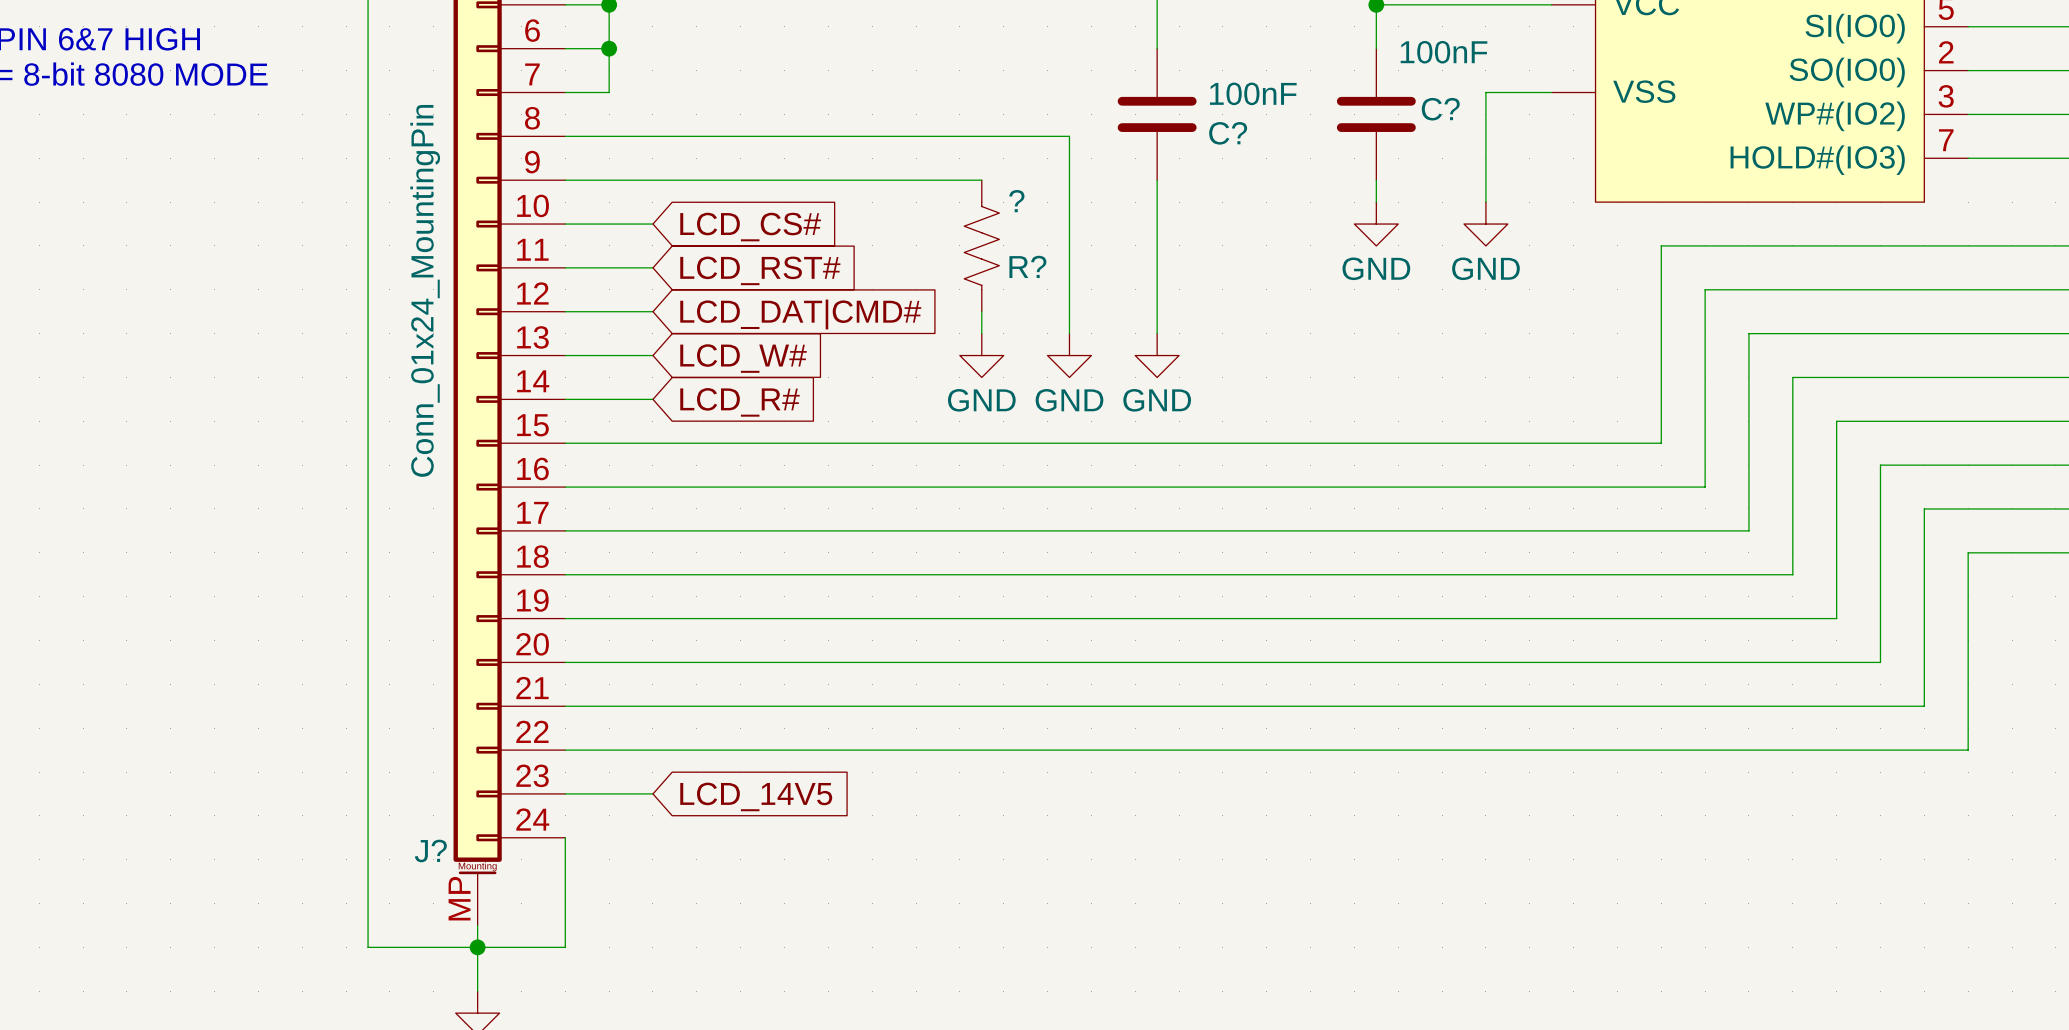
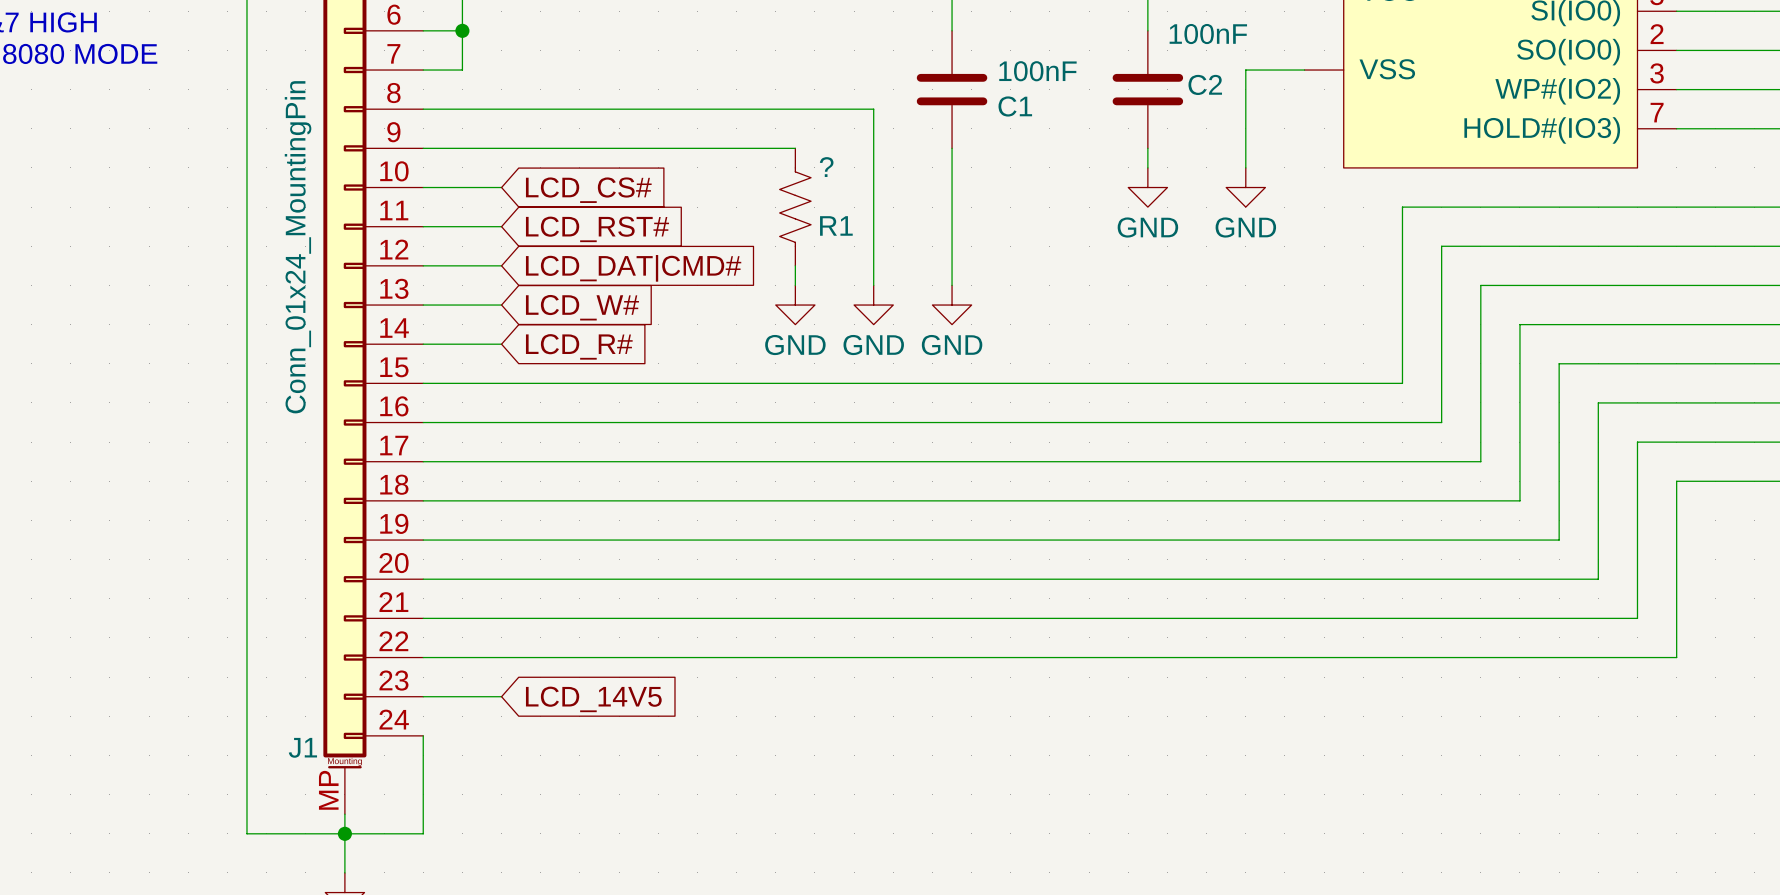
C? name: C? (1440, 109) -> C2 (1205, 84)
C? name: C? (1228, 133) -> C1 (1015, 106)
R? name: R? (1027, 266) -> R1 (836, 225)
J? name: J? (430, 850) -> J1 (302, 747)

